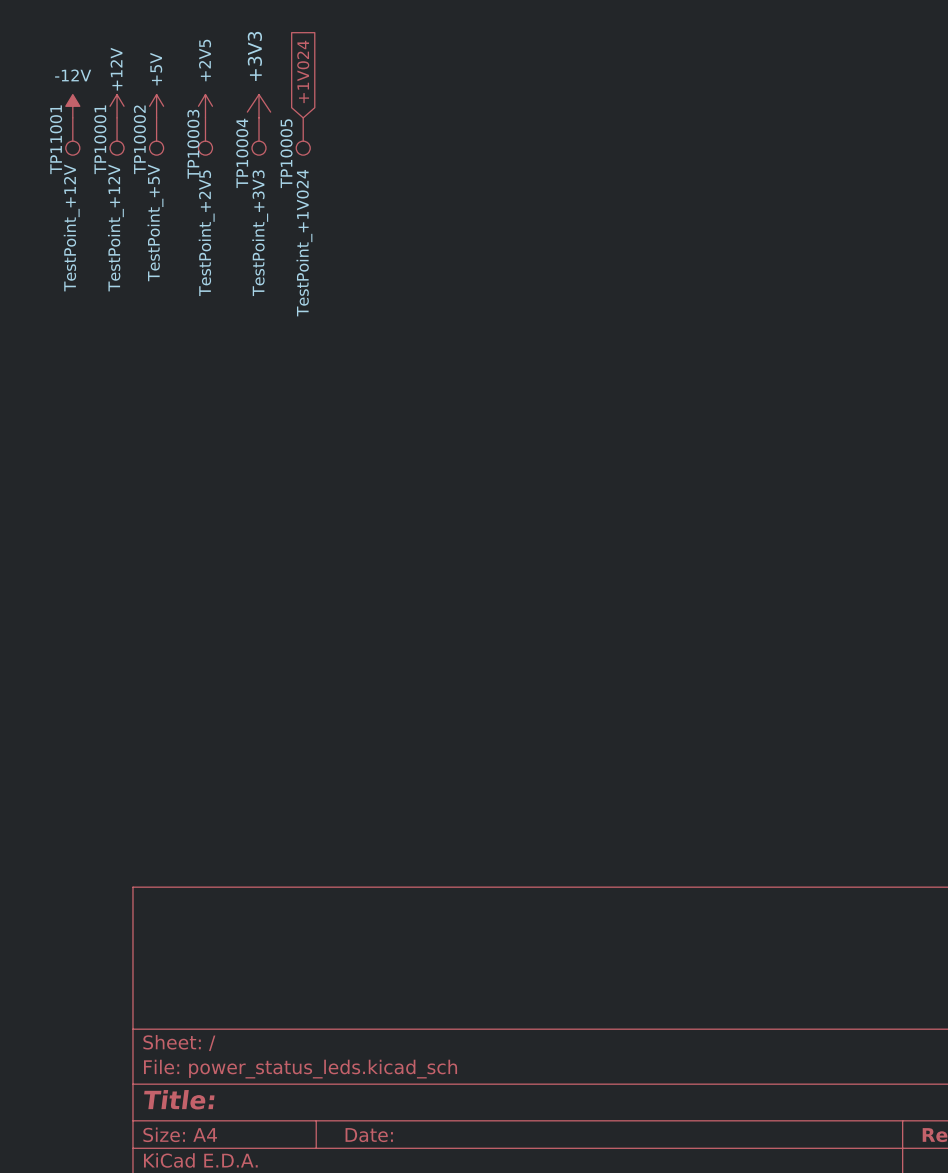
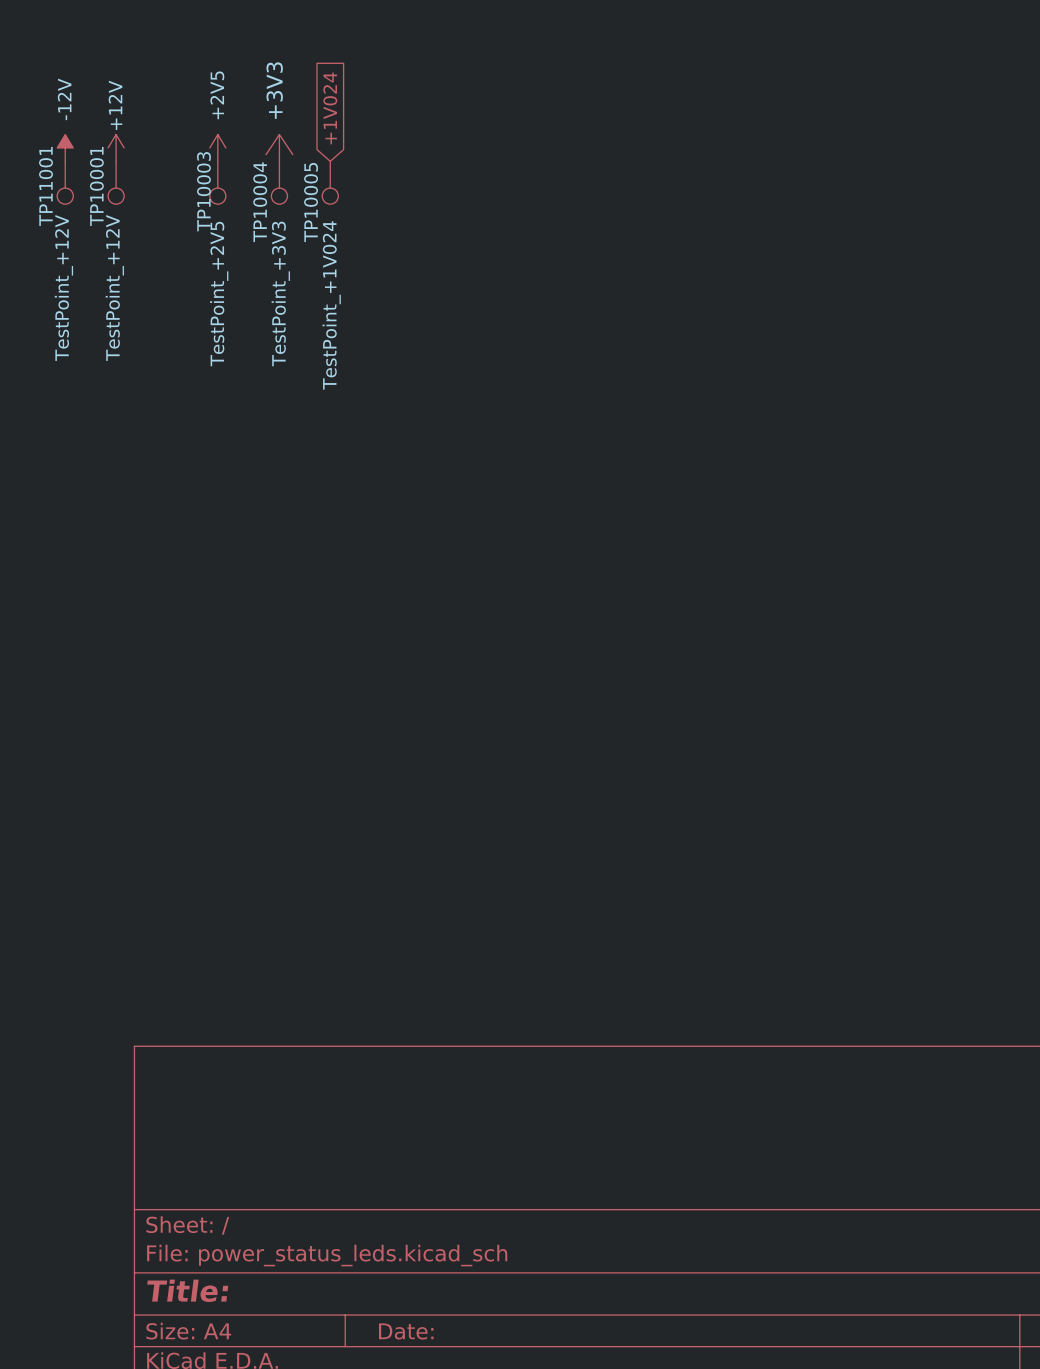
power symbol text rotation: 0° (73, 75) -> 90° counterclockwise (64, 99)
power symbol: +5V (156, 106) -> none
TP10002: TestPoint_+5V (156, 136) -> none

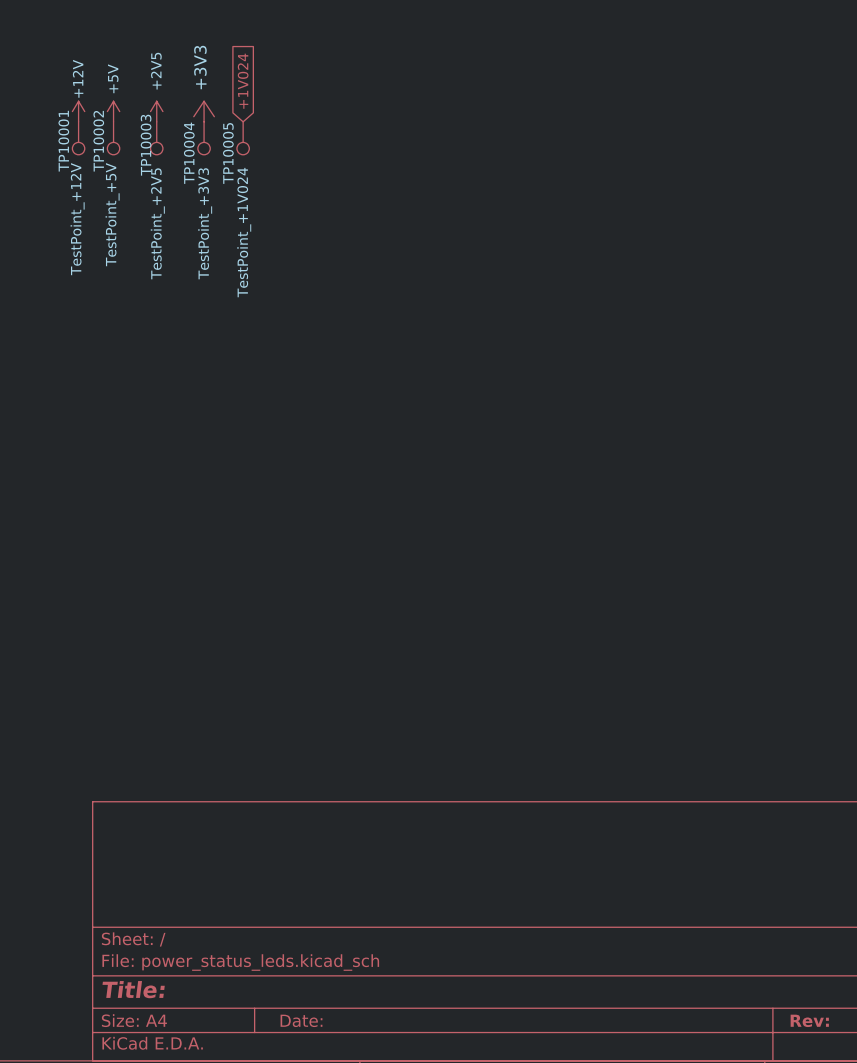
power symbol: -12V (65, 147) -> none
power symbol: none -> +5V (113, 111)
TP11001: TestPoint_+12V (65, 182) -> none
TP10002: none -> TestPoint_+5V (113, 138)

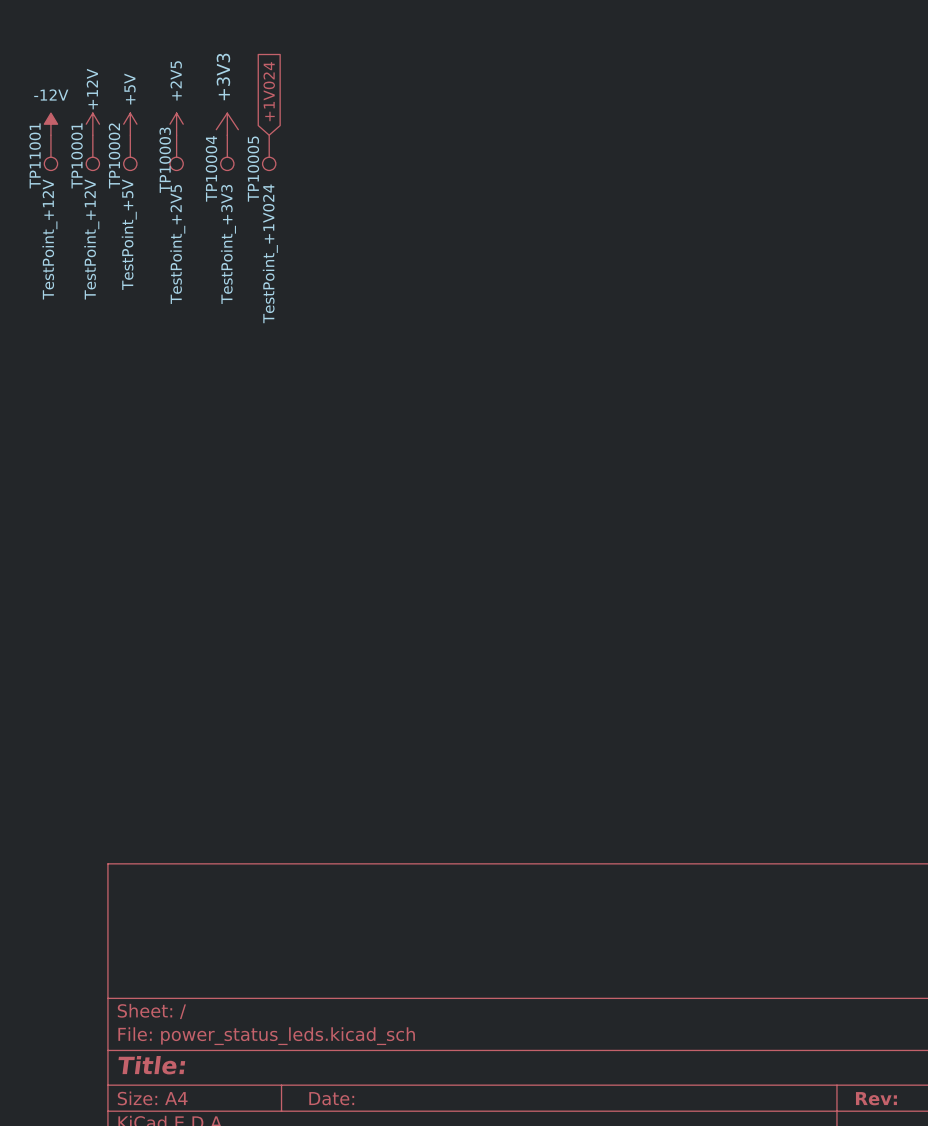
power symbol: none -> -12V (50, 124)
TP11001: none -> TestPoint_+12V (50, 152)

